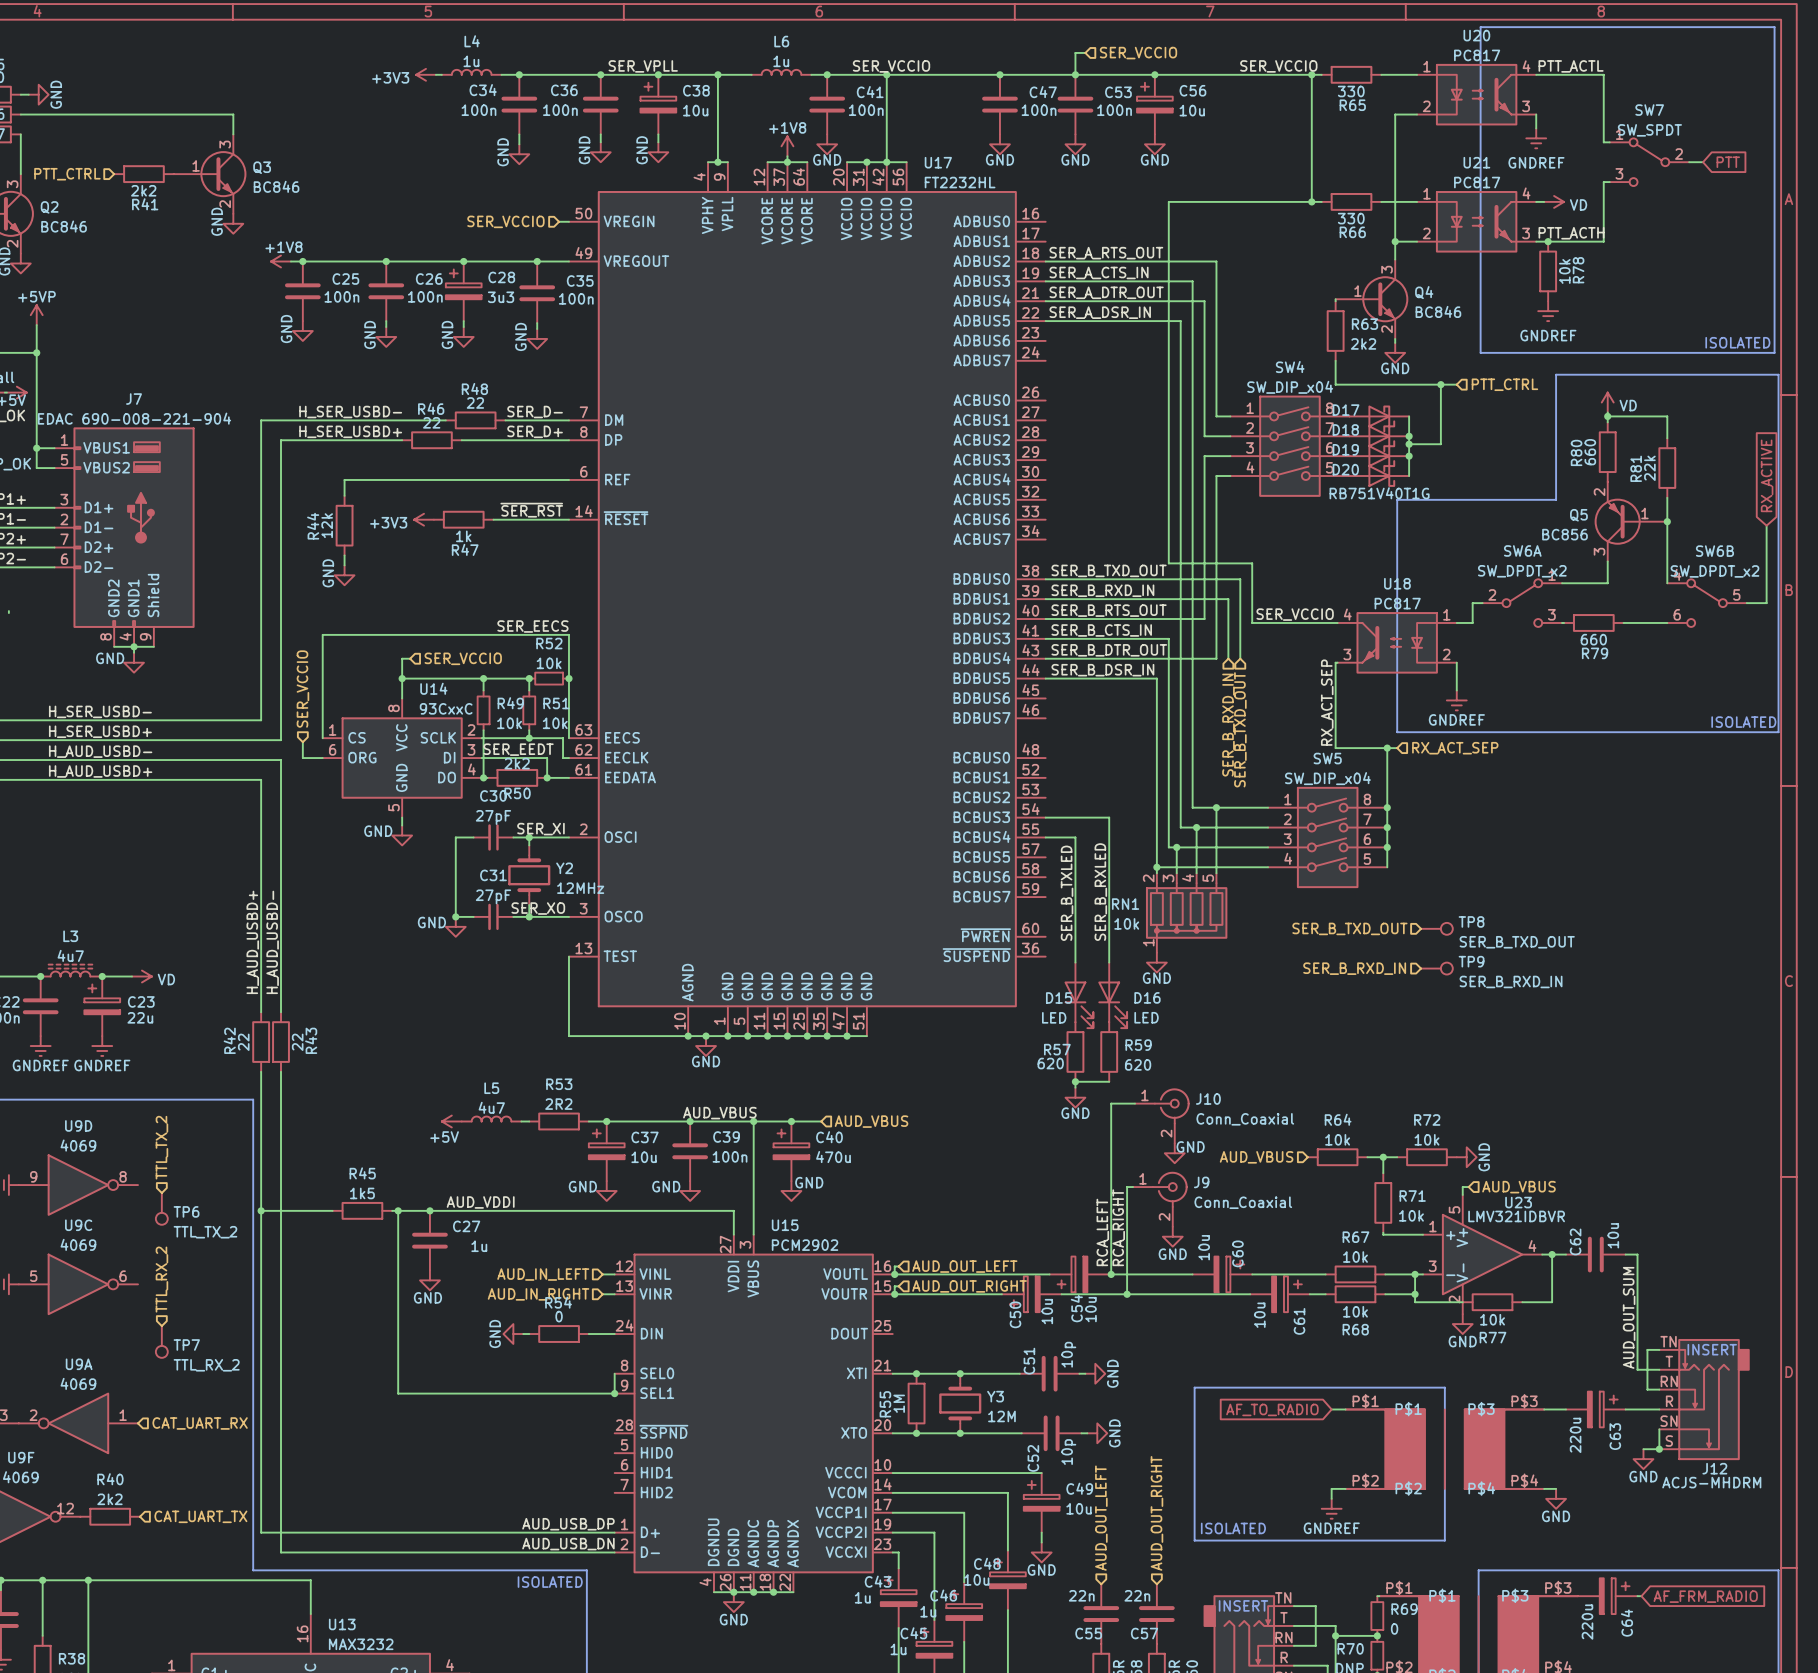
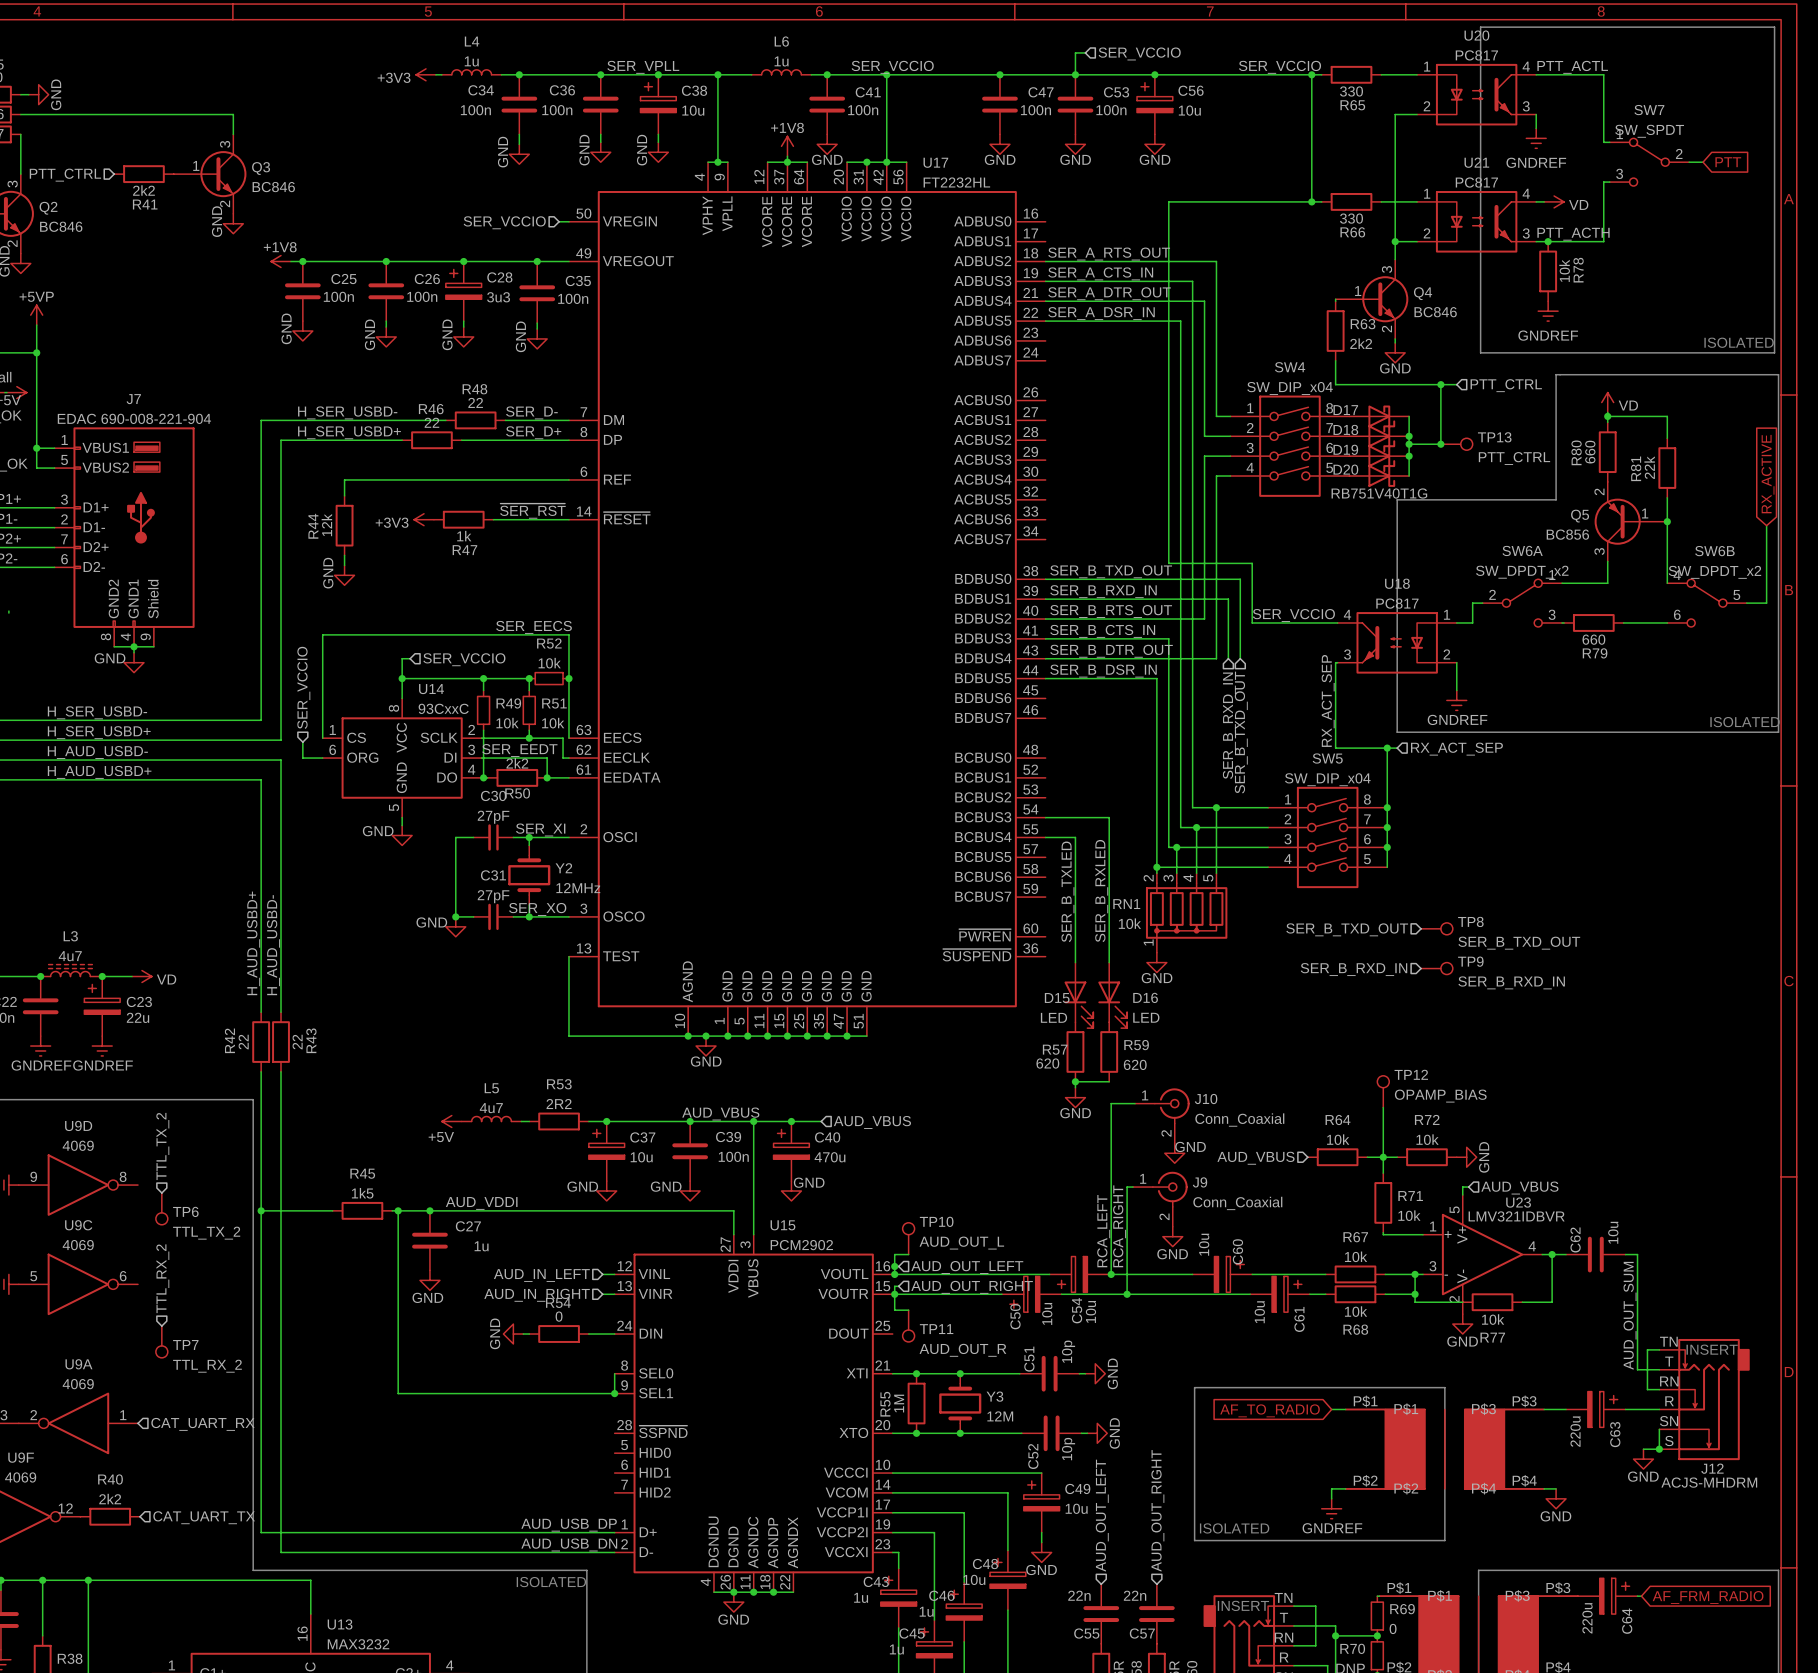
junction: none -> (1440, 444)
TP13: none -> PTT_CTRL (1456, 444)
TP12: none -> OPAMP_BIAS (1383, 1091)
wire: none -> (1383, 1107) (1383, 1157)
TP10: none -> AUD_OUT_L (908, 1238)
wire: none -> (908, 1254) (894, 1254) (894, 1266)
junction: none -> (894, 1266)
wire: none -> (894, 1294) (894, 1310) (908, 1310)
TP11: none -> AUD_OUT_R (908, 1326)

